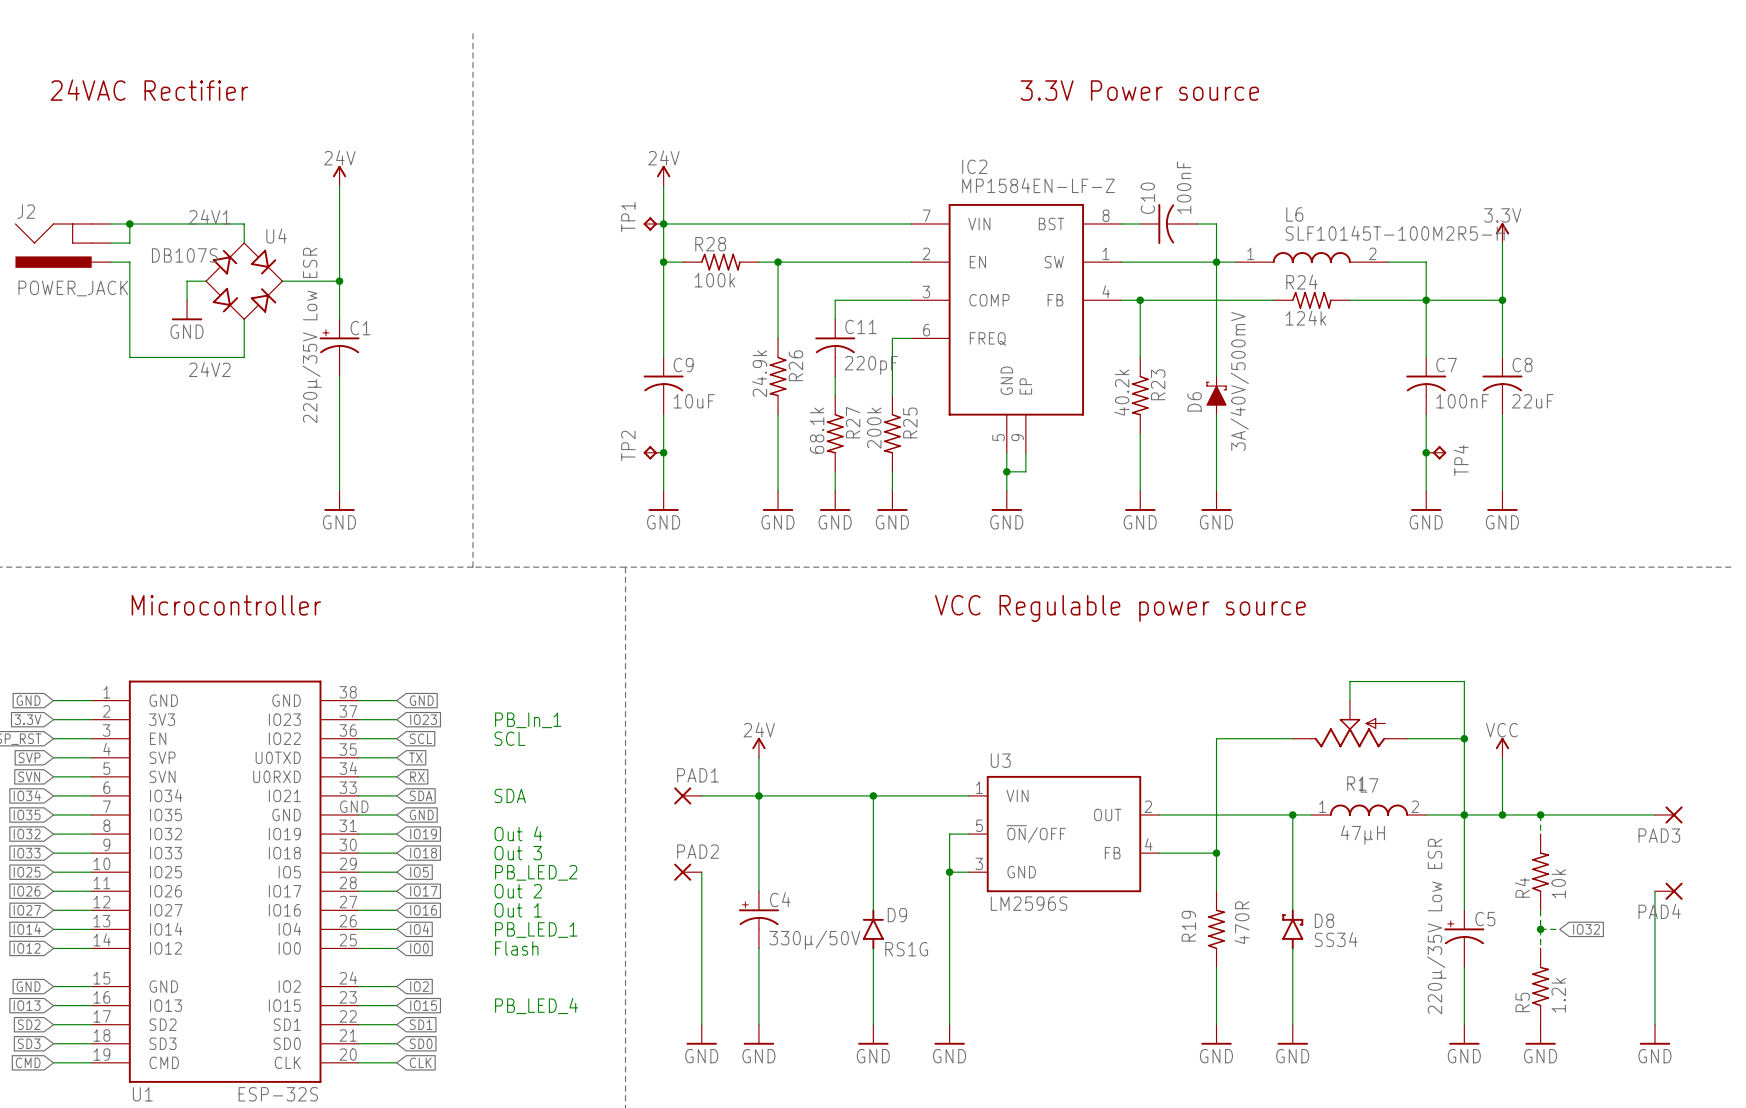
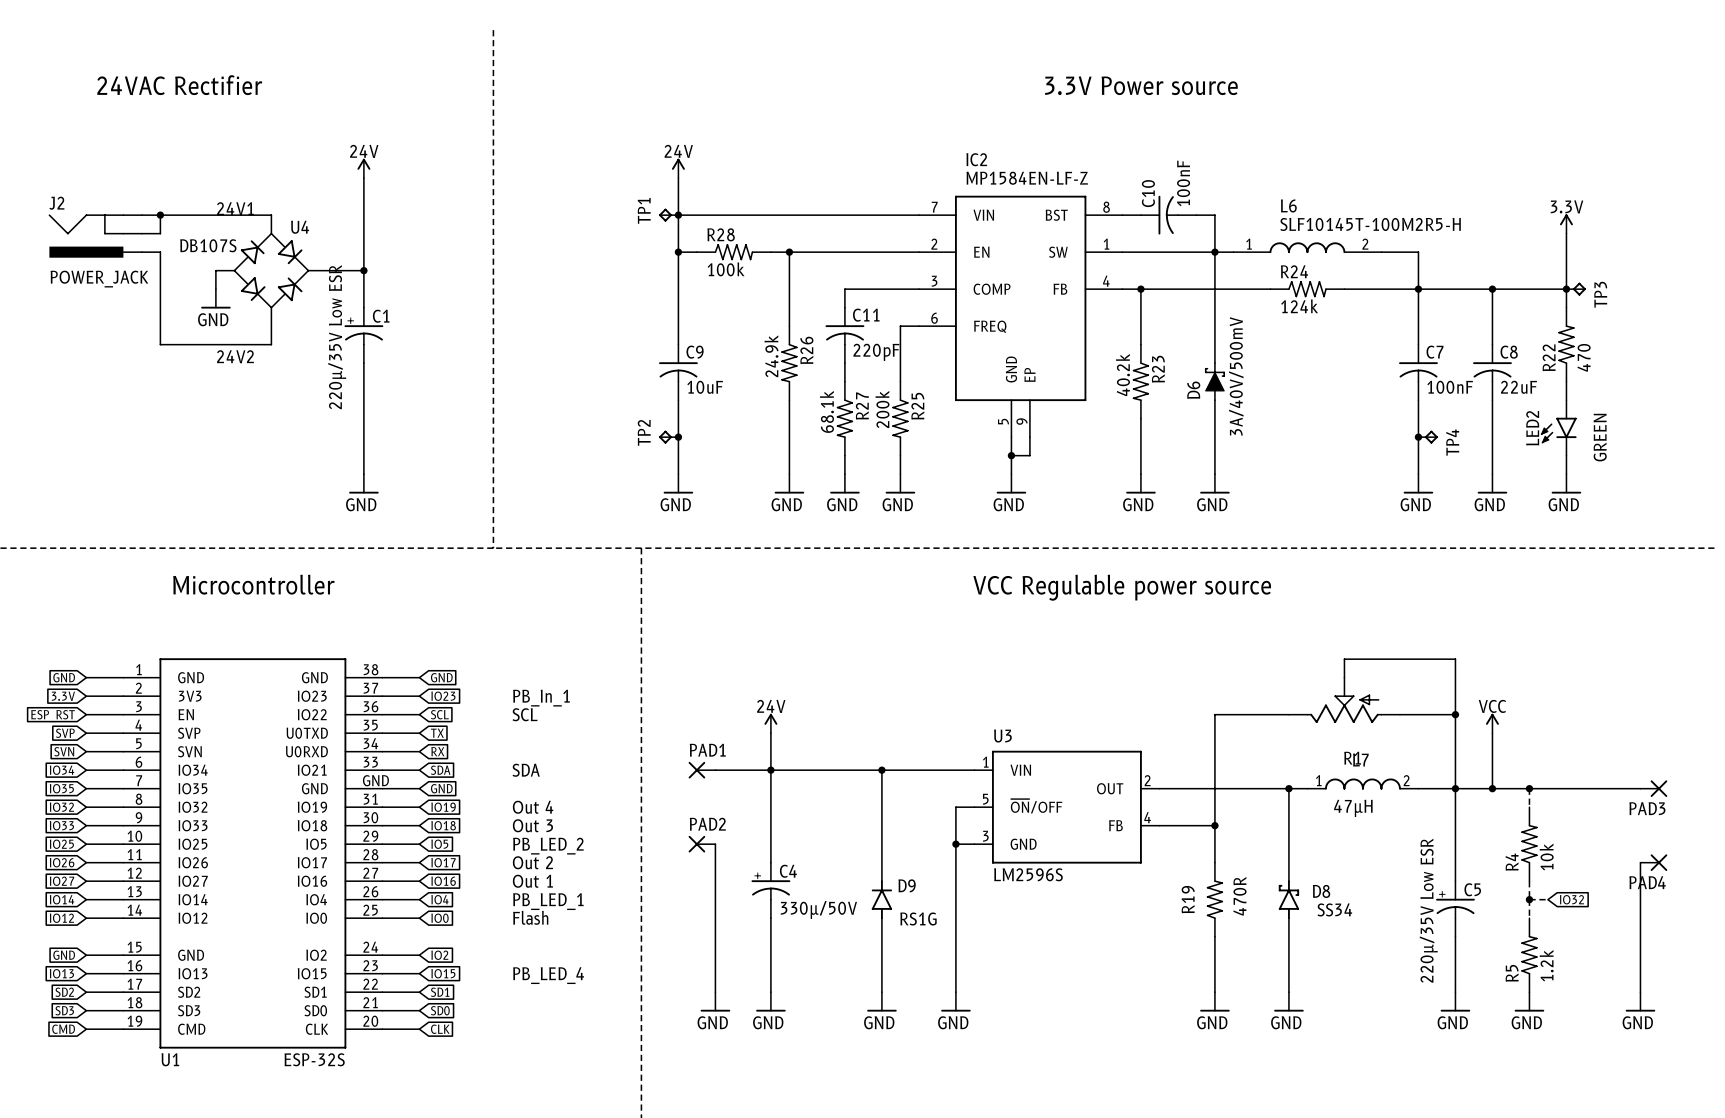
power symbol position: 3.3V (1502, 233) -> 3.3V (1566, 223)
wire: (1502, 243) (1502, 300) -> (1566, 289) (1492, 289)
wire: none -> (1566, 233) (1566, 307)
junction: none -> (1566, 289)
TP3: none -> (1576, 289)
R22: none -> 470 (1566, 344)
wire: none -> (1566, 381) (1566, 400)
LED2: none -> GREEN (1558, 427)
wire: none -> (1566, 455) (1566, 474)
power symbol: none -> GND (1566, 483)

